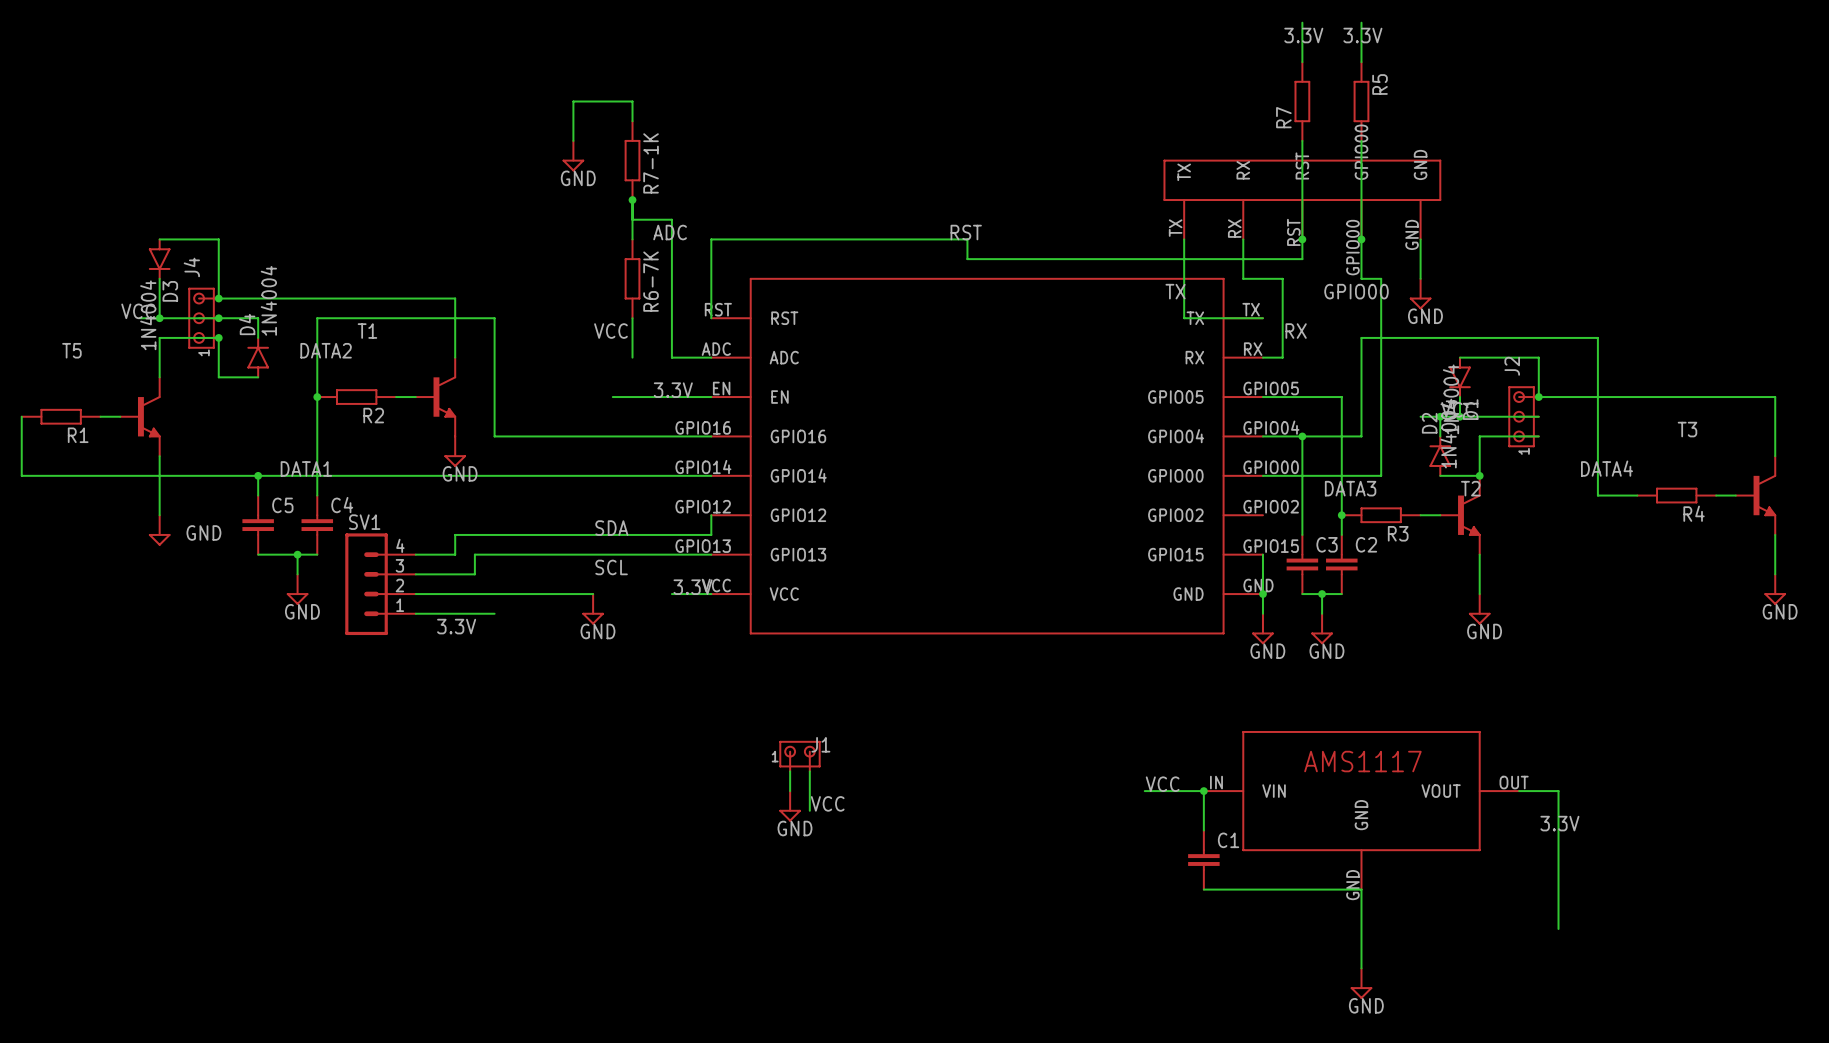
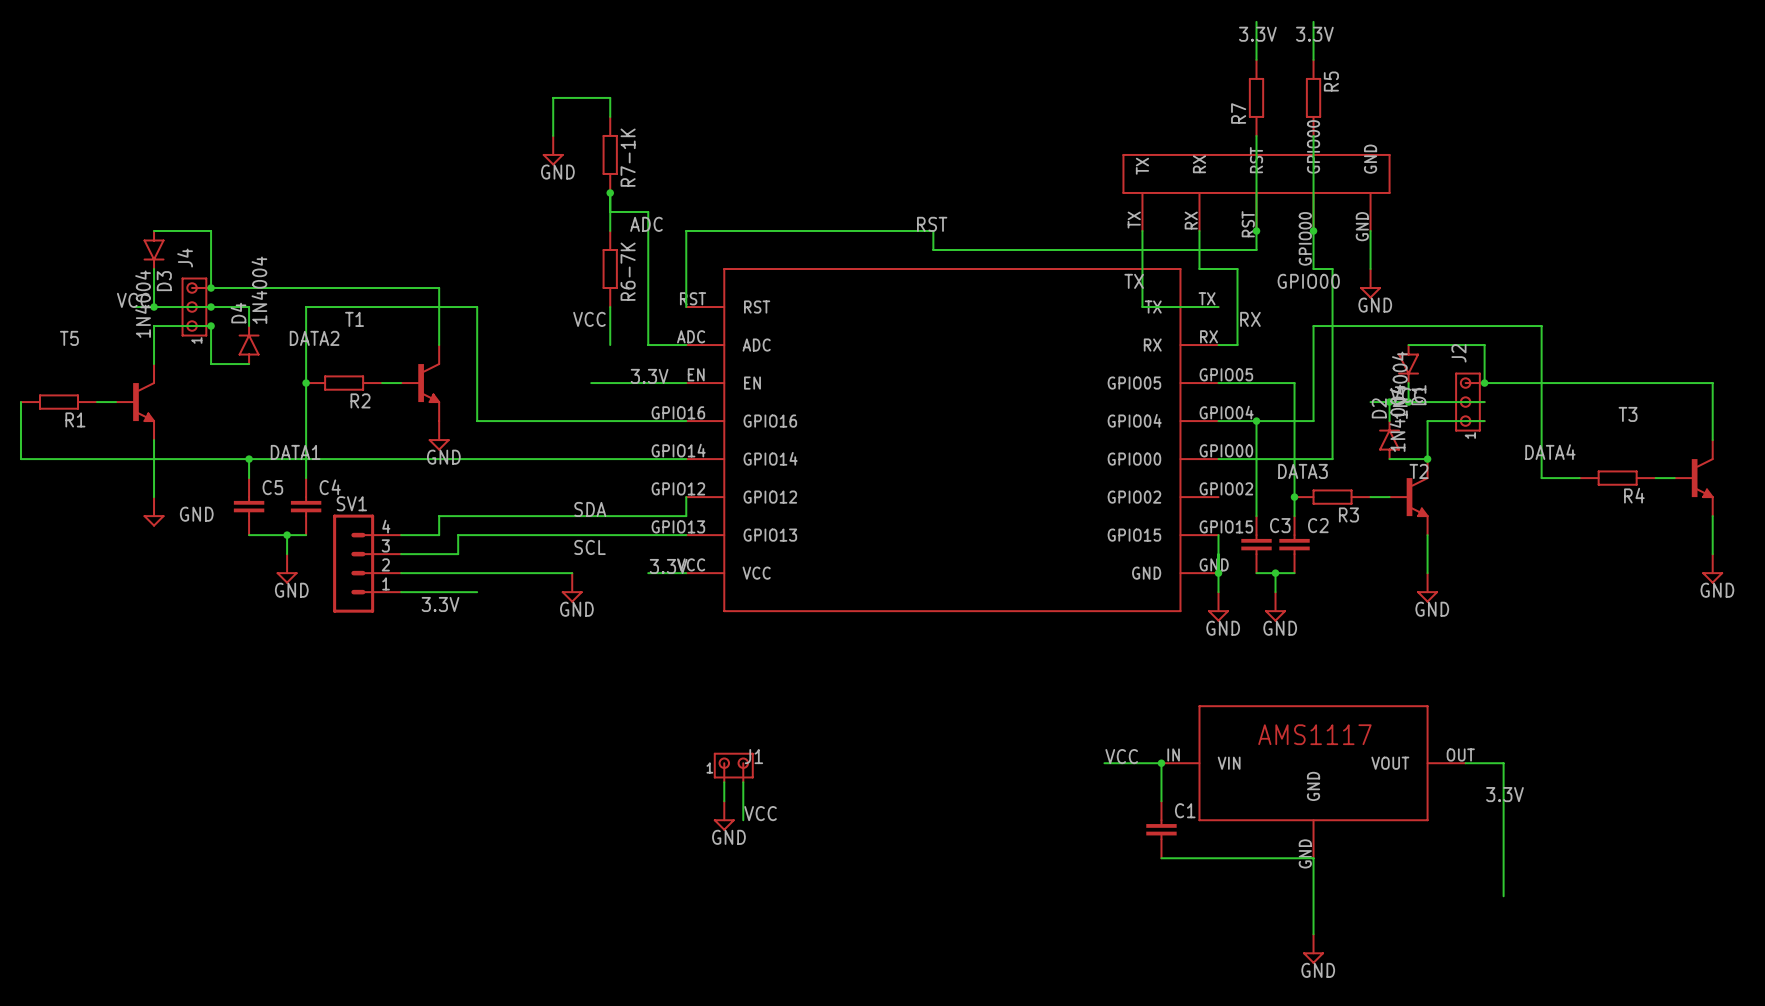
J1 position: (799, 756) -> (733, 767)
wire: (790, 771) (790, 791) -> (724, 782) (724, 801)
wire: (809, 771) (809, 810) -> (743, 782) (743, 820)
label position: VCC (827, 803) -> VCC (760, 813)
power symbol position: GND (790, 806) -> GND (724, 815)

